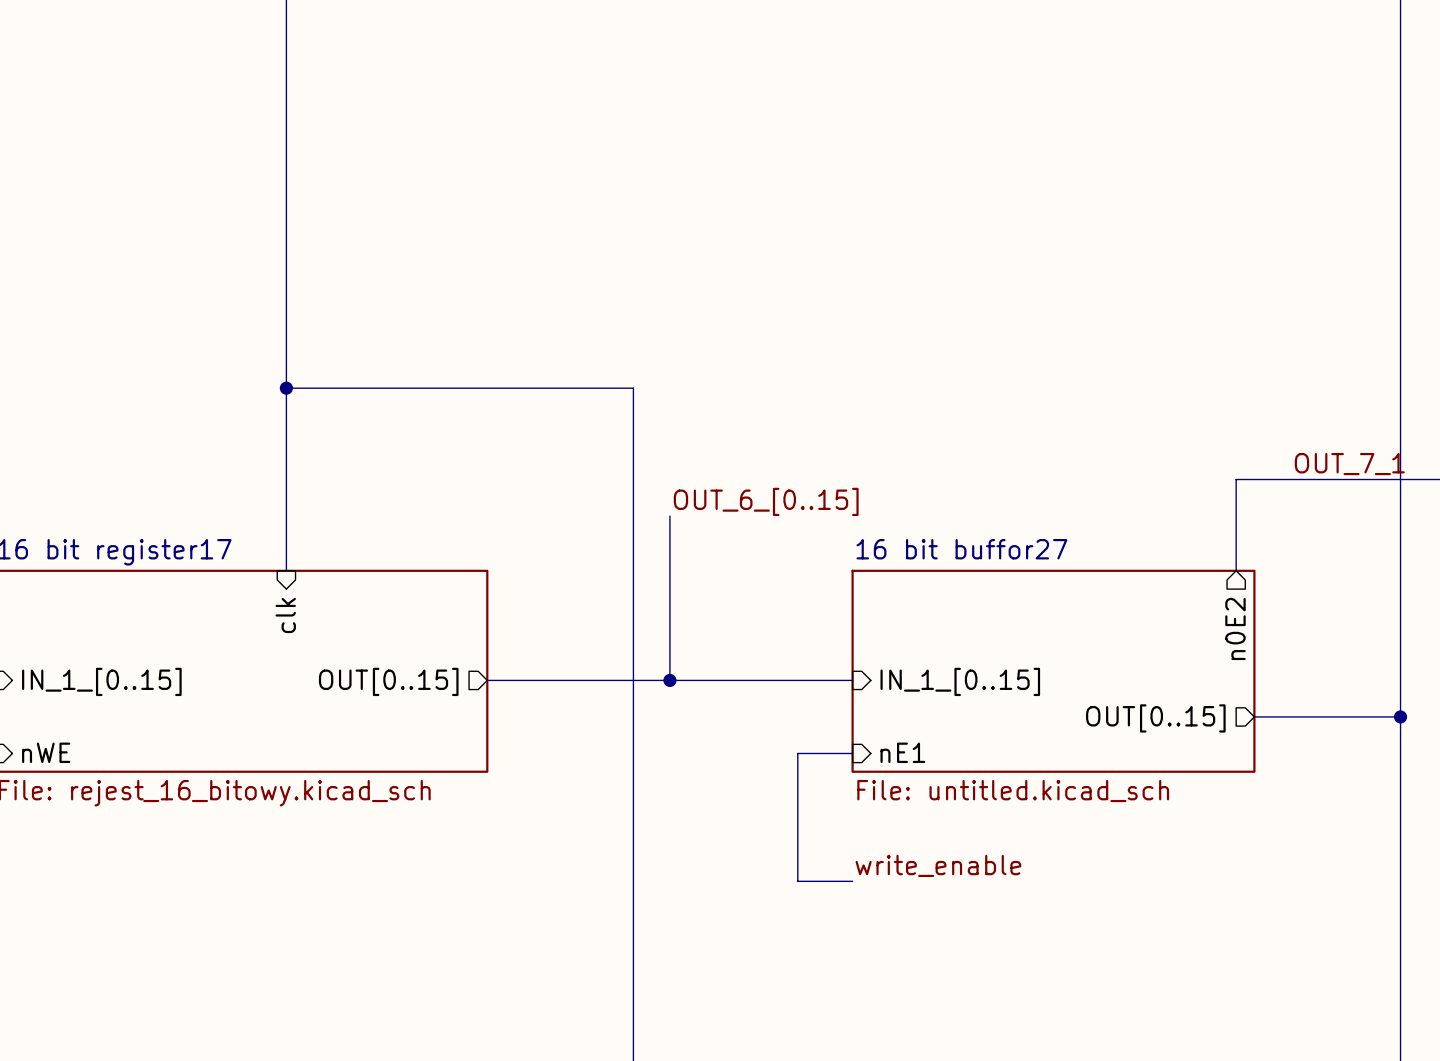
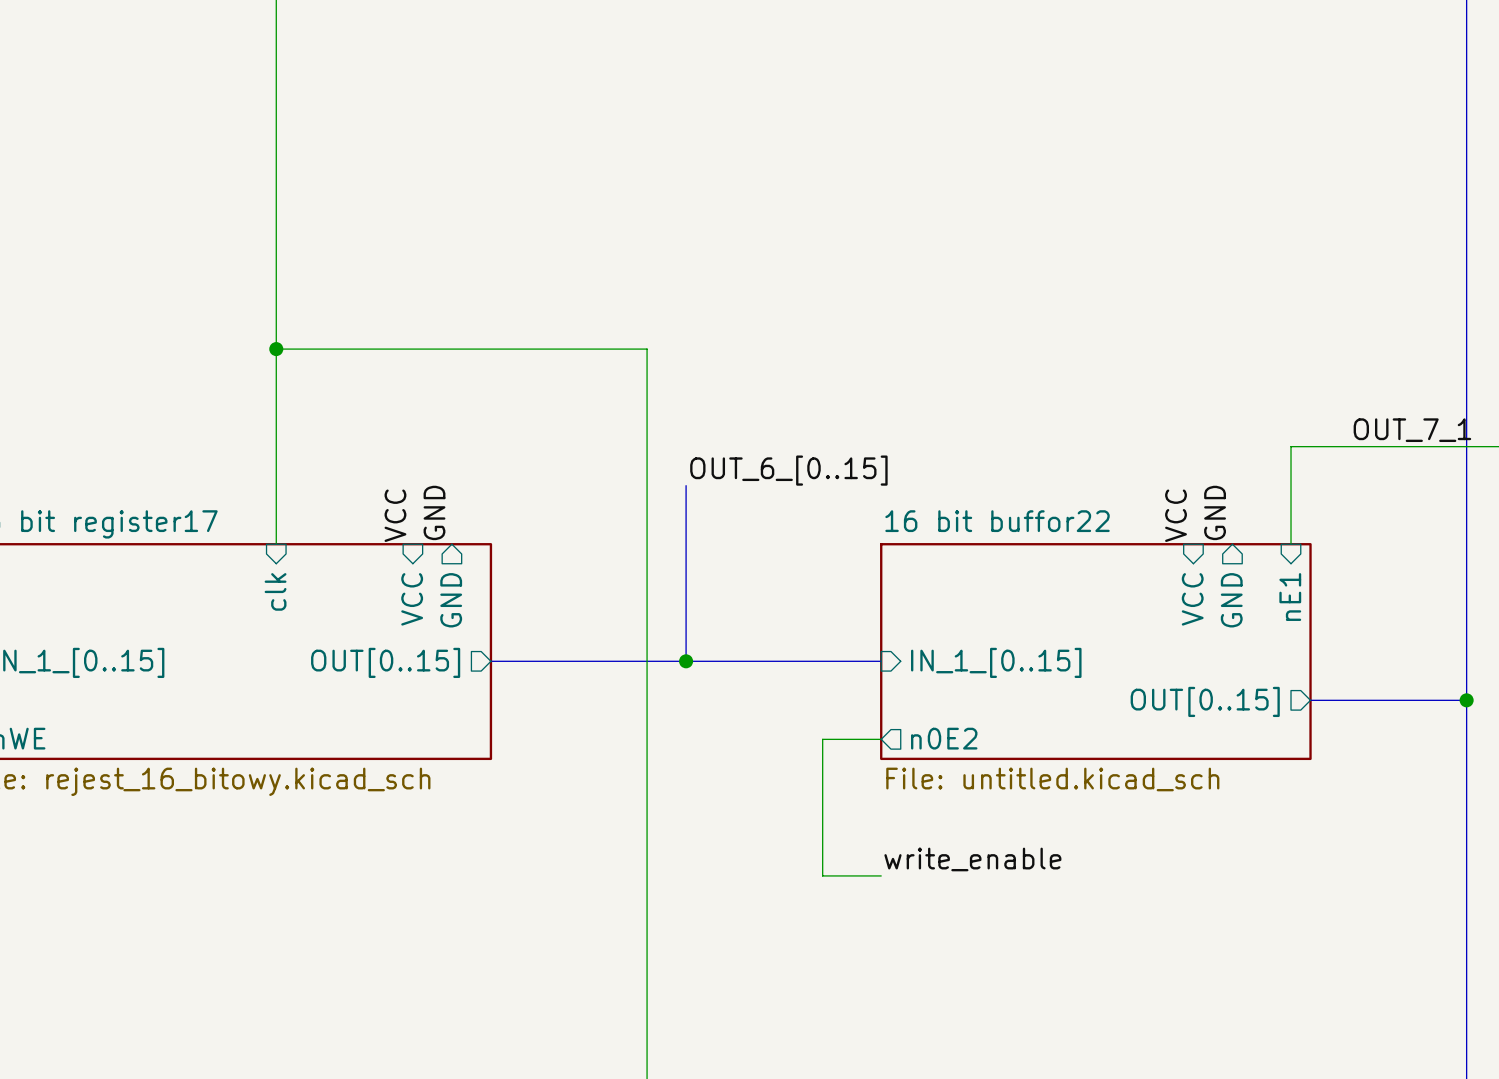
label: none -> GND (434, 512)
label: none -> GND (1215, 512)
label: none -> VCC (395, 515)
label: none -> VCC (1176, 515)
sheet 16 bit buffor27 name: 16 bit buffor27 (961, 549) -> 16 bit buffor22 (997, 521)
sheet pin: none -> VCC (412, 599)
sheet pin: none -> VCC (1192, 599)
sheet pin: none -> GND (451, 600)
sheet pin: none -> GND (1231, 600)
sheet pin shape: output (1235, 628) -> input (1290, 597)
sheet pin: n0E2 (1235, 628) -> nE1 (1290, 597)
sheet pin shape: input (902, 752) -> output (944, 738)
sheet pin: nE1 (902, 752) -> n0E2 (944, 738)

